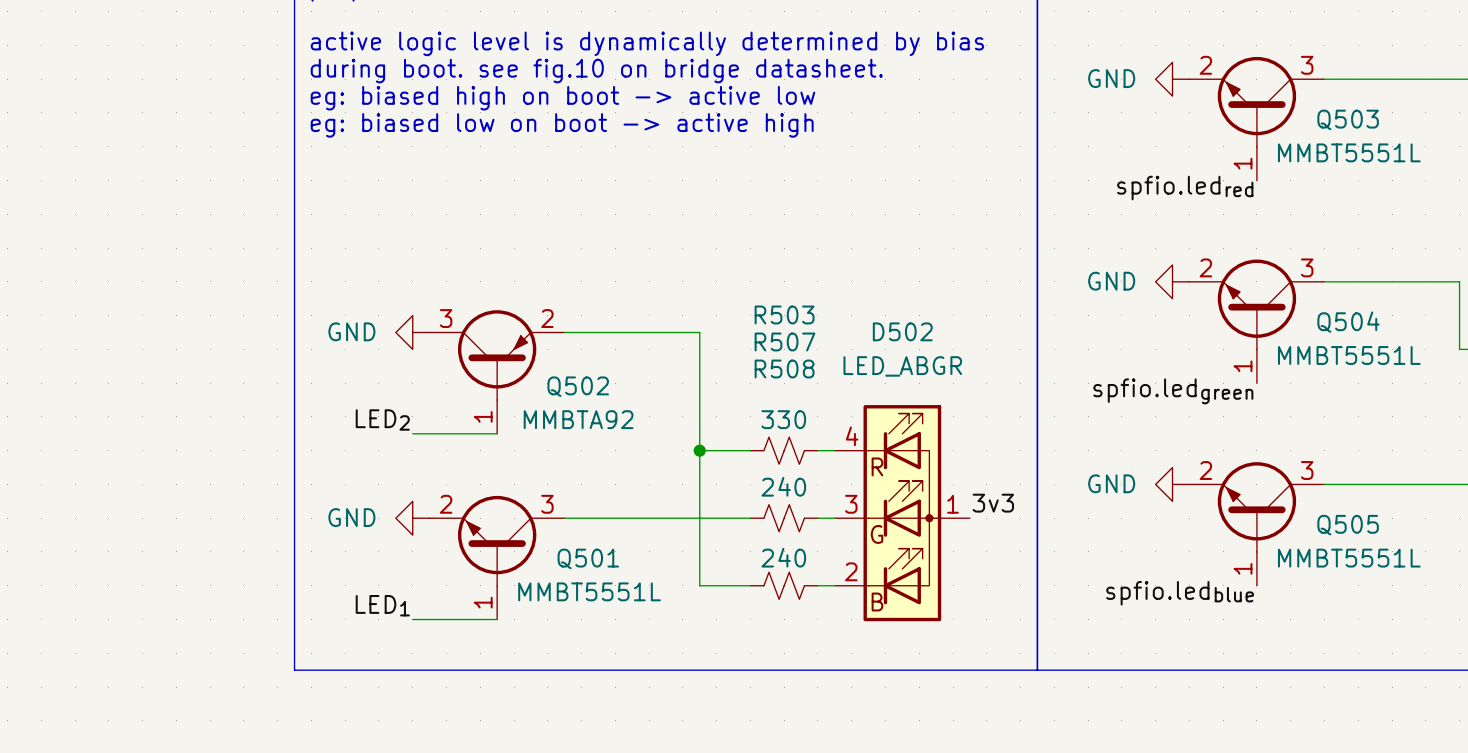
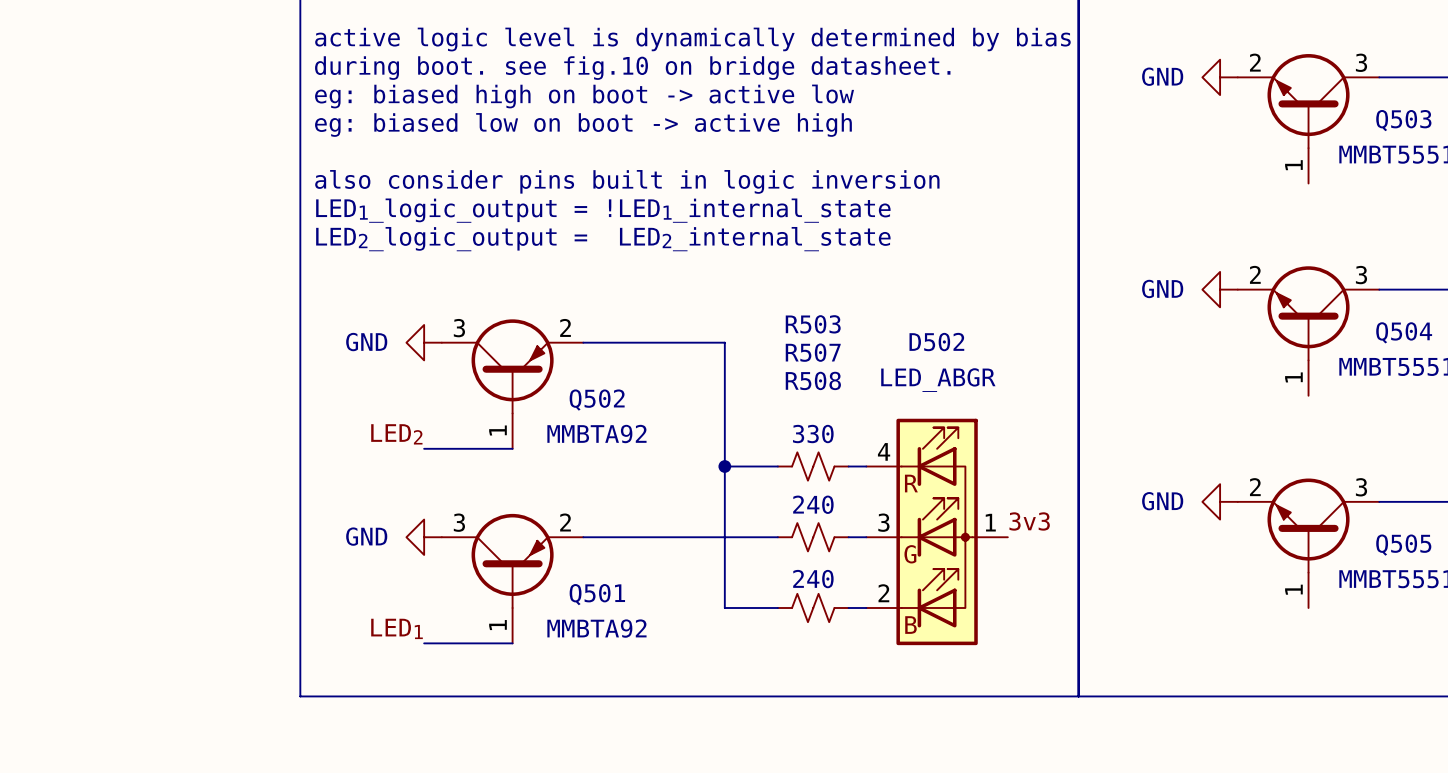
text: none -> also consider pins built in logic inversion (627, 181)
label: spfio.ledred (1185, 188) -> none
text: none -> LED1_logic_output = !LED1_internal_state (603, 210)
text: none -> LED2_logic_output = LED2_internal_state (603, 239)
label: spfio.ledgreen (1173, 391) -> none
Q501 symbol: [429, 495, 565, 620] -> [441, 513, 584, 644]
Q501 value: MMBT5551L (589, 591) -> MMBTA92 (596, 628)
label: spfio.ledblue (1180, 593) -> none

